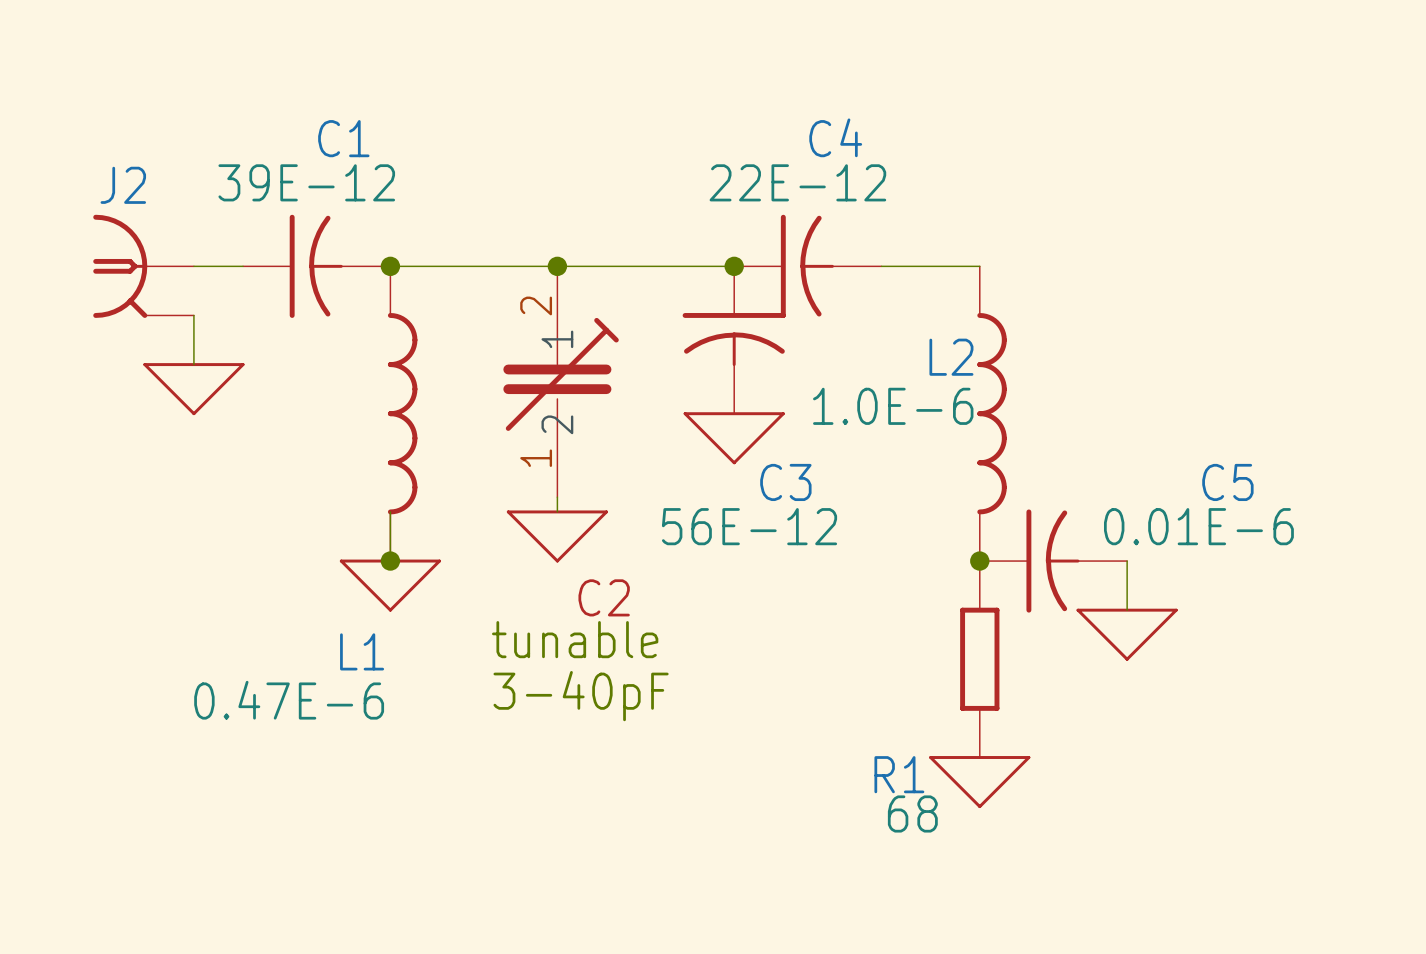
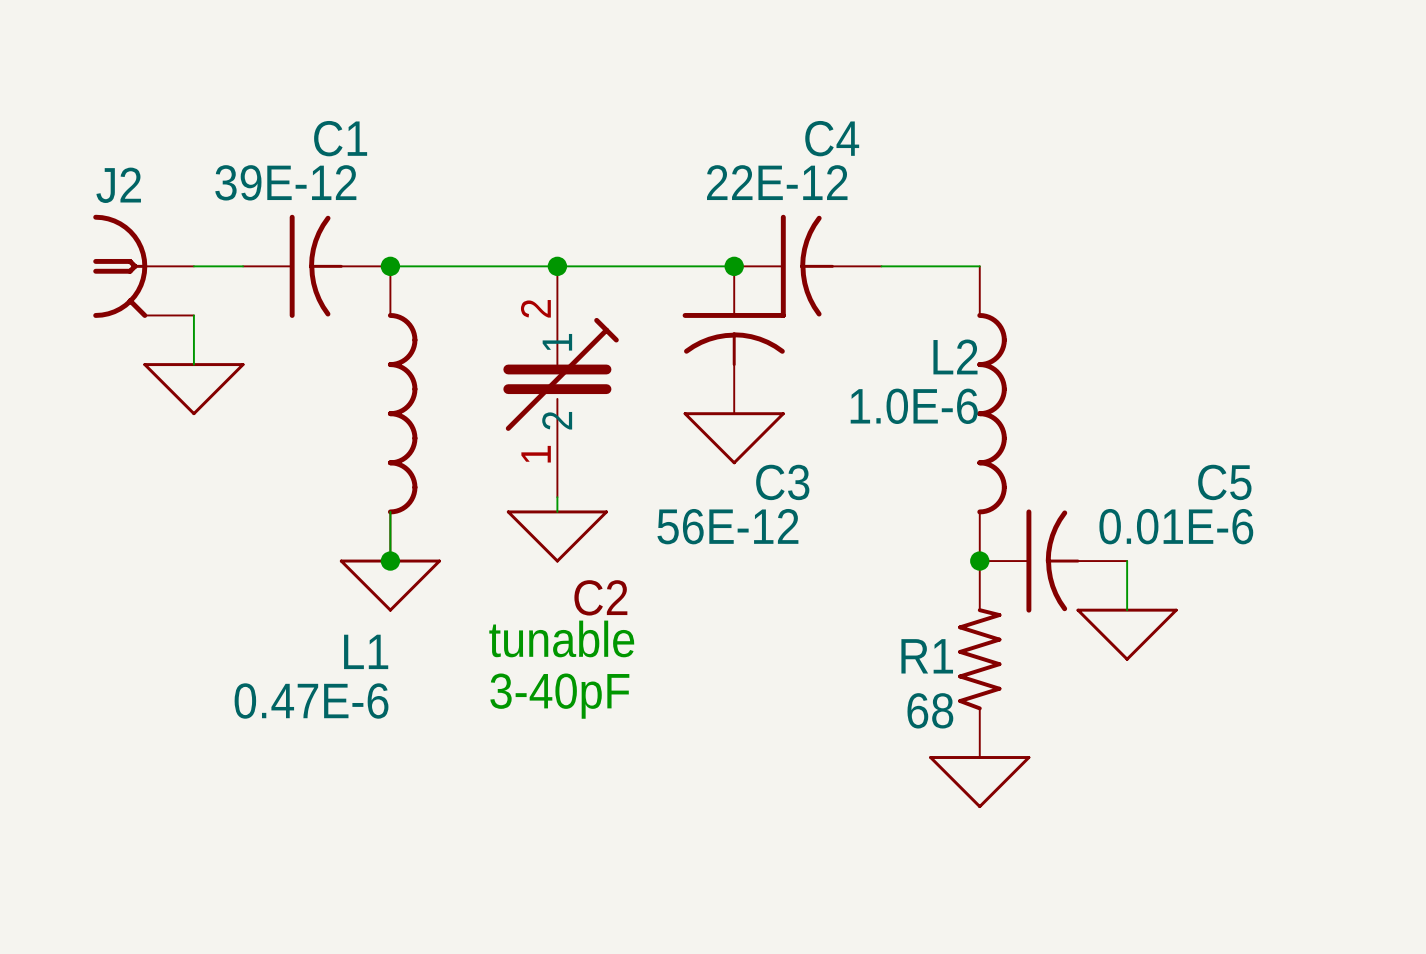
R1 symbol: [960, 561, 1000, 758] -> [958, 561, 1002, 758]
R1 name position: R1 (899, 774) -> R1 (927, 656)
R1 value position: 68 (912, 813) -> 68 (930, 710)

